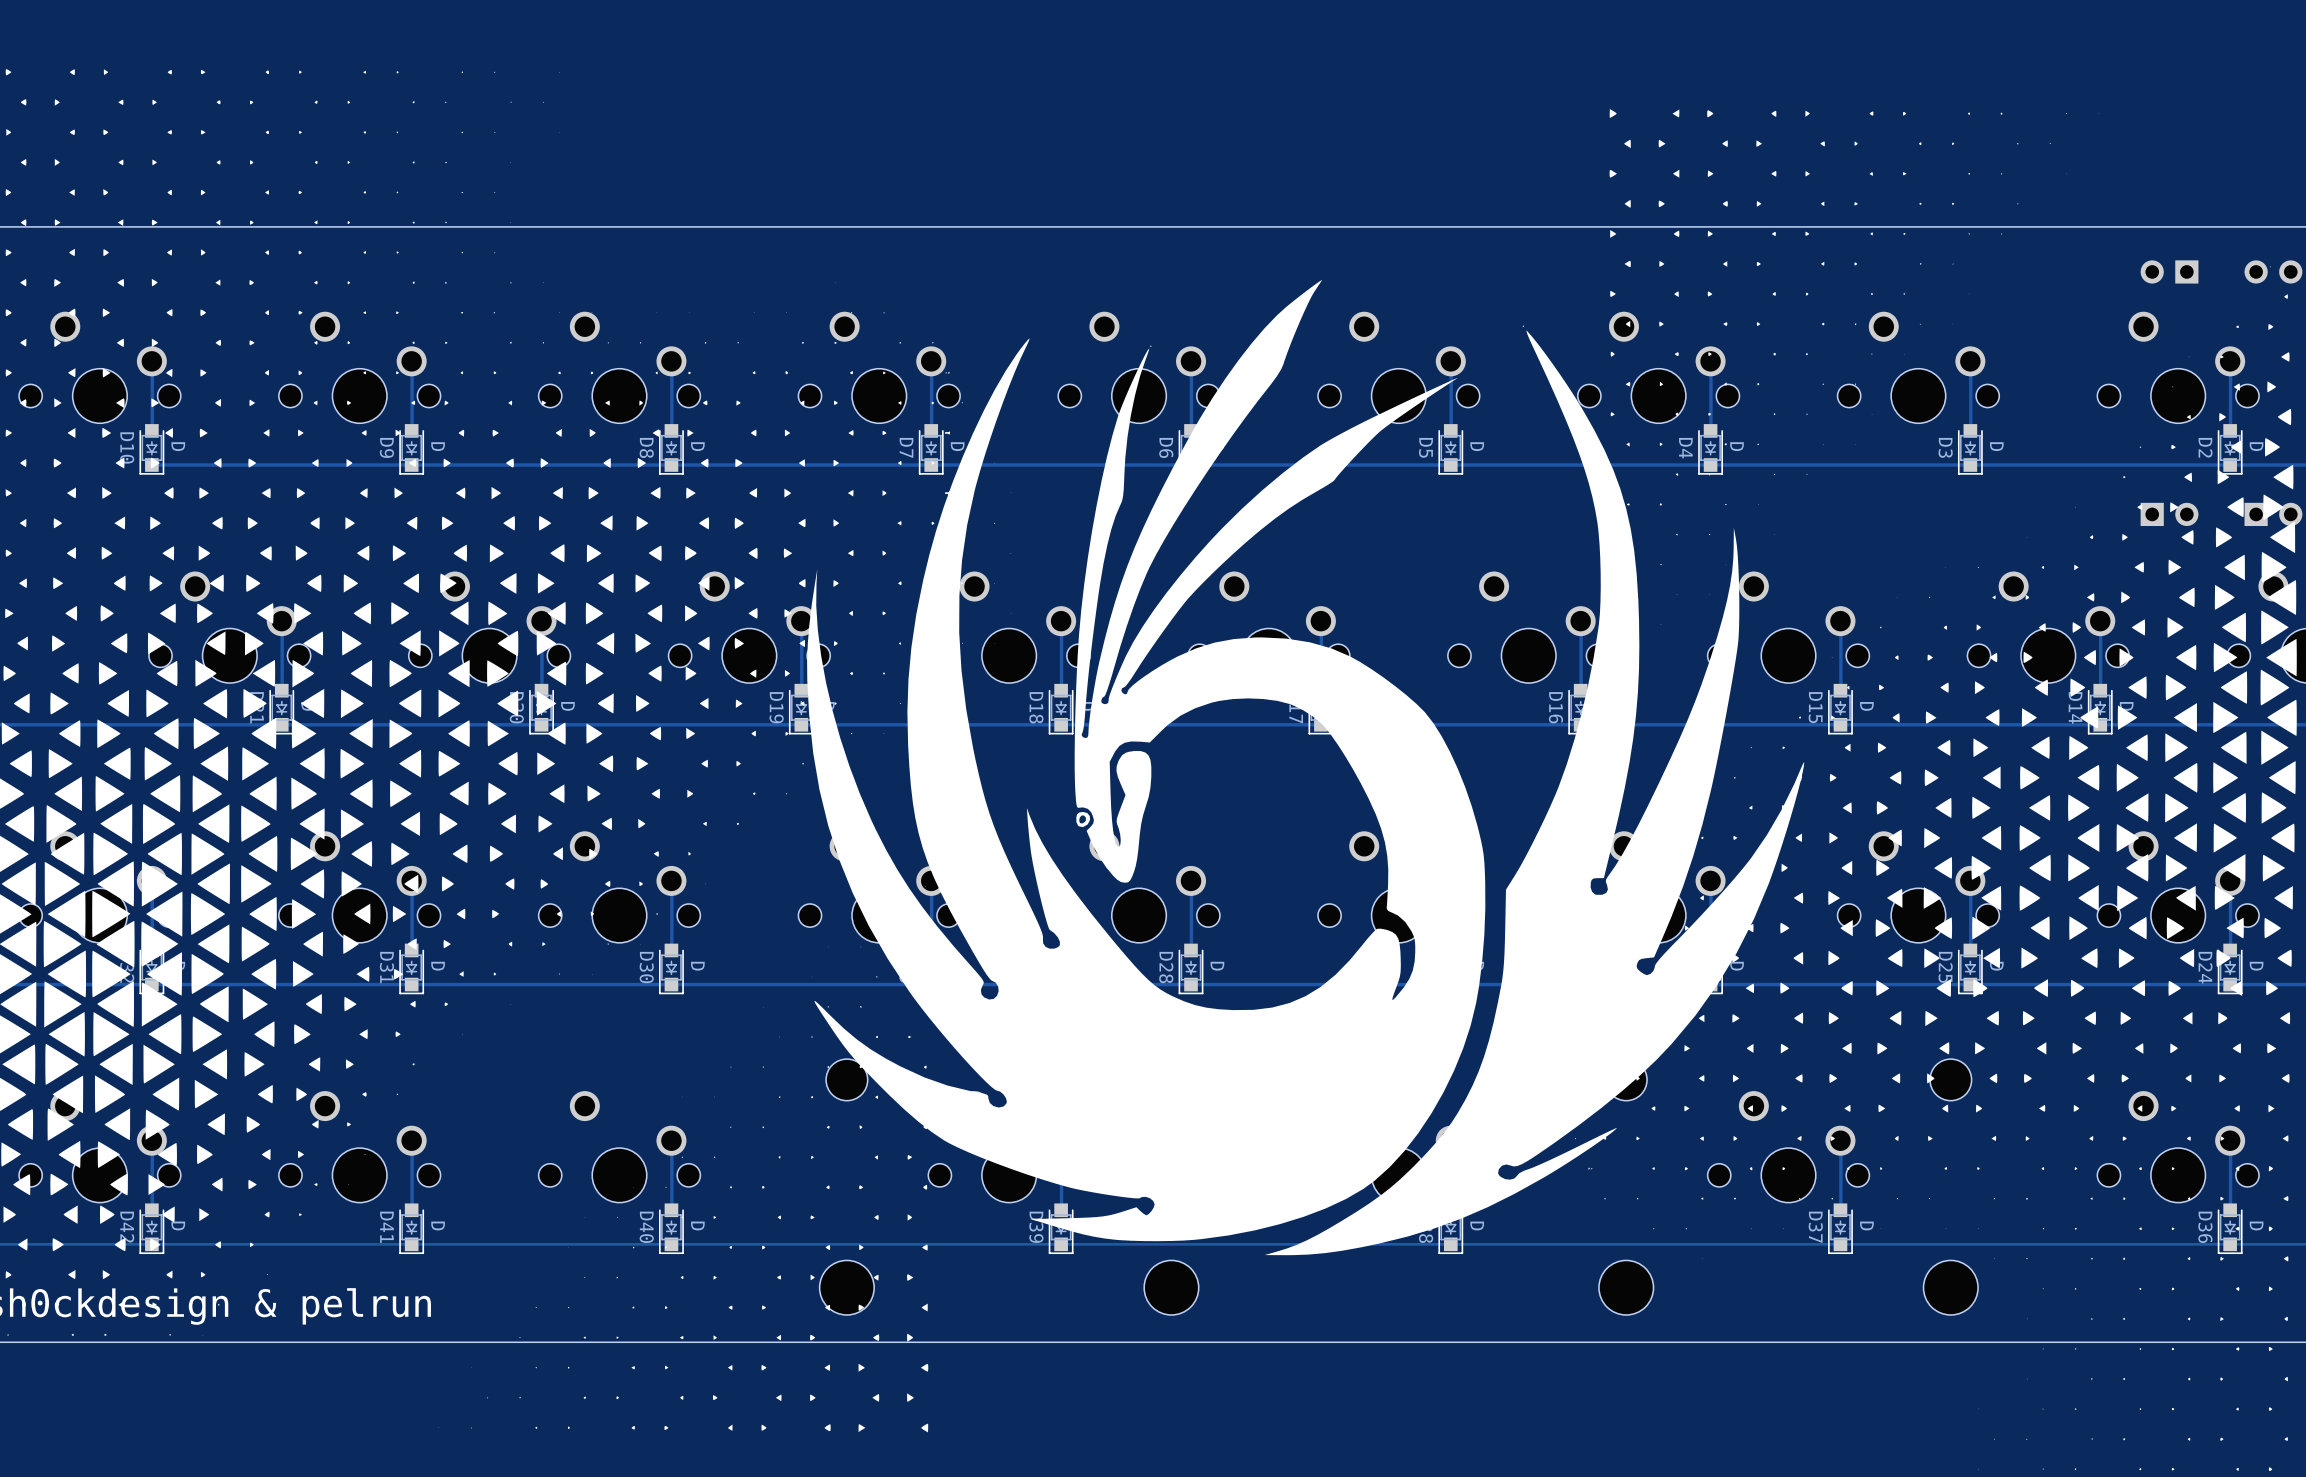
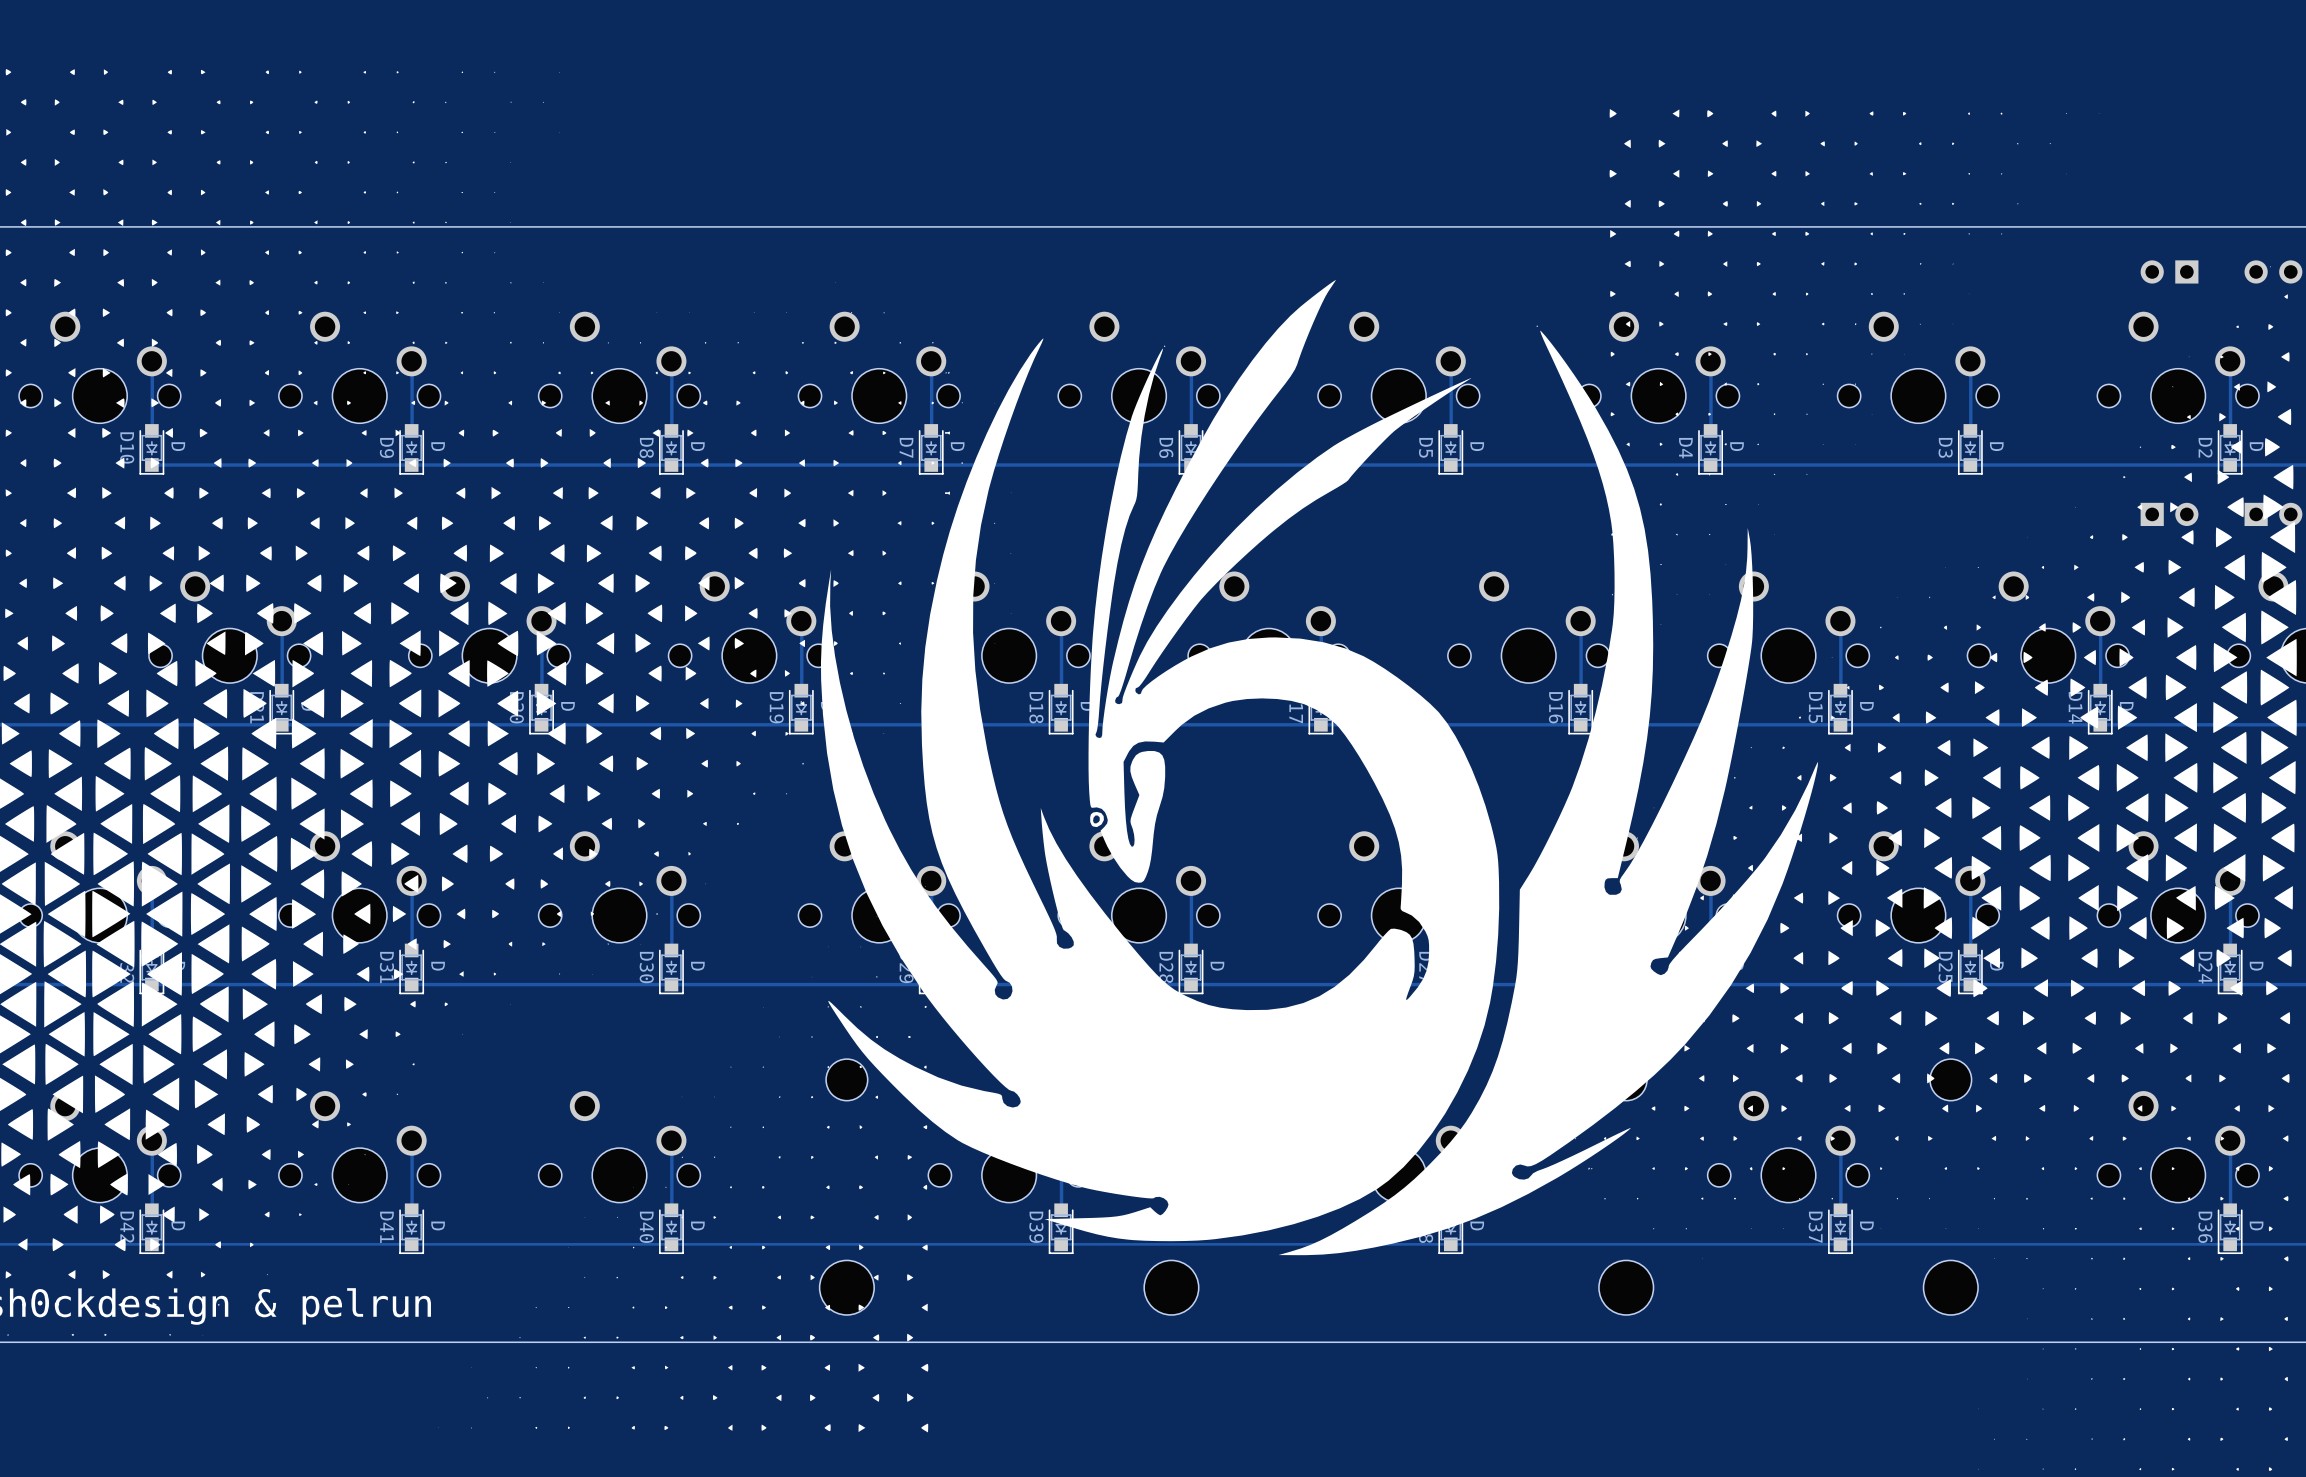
drawing position: (1305, 767) -> (1319, 767)

